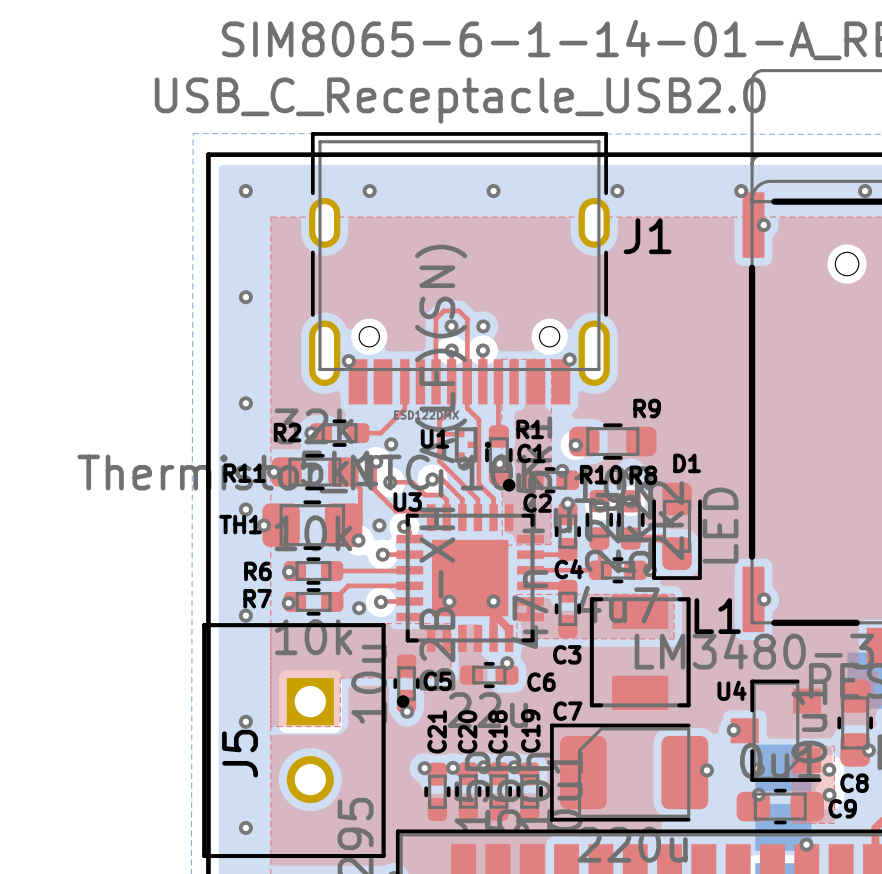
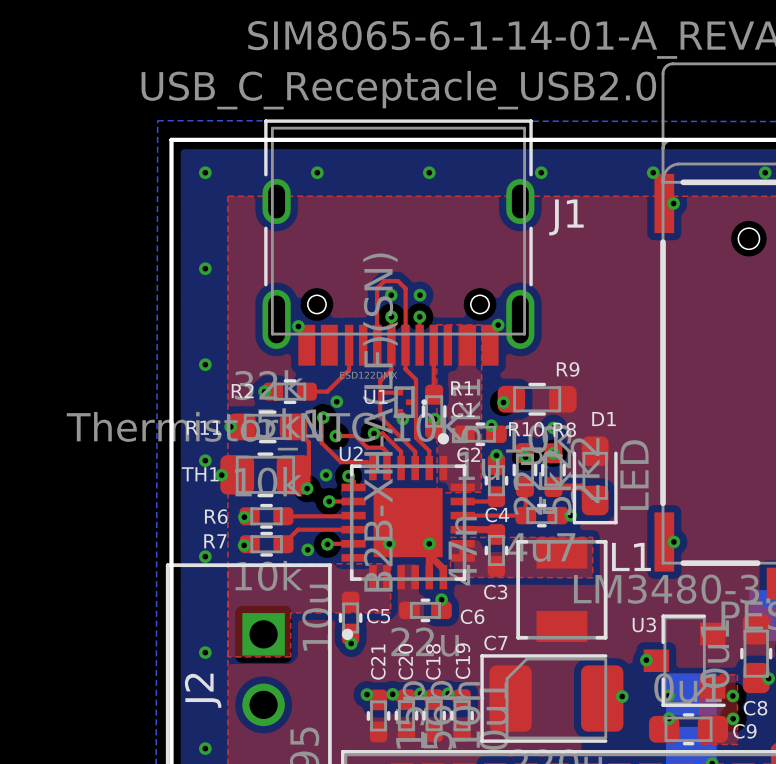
U3 name: U3 (407, 501) -> U2 (351, 453)
U4 name: U4 (732, 690) -> U3 (644, 624)
J5 name: J5 (240, 753) -> J2 (203, 690)

